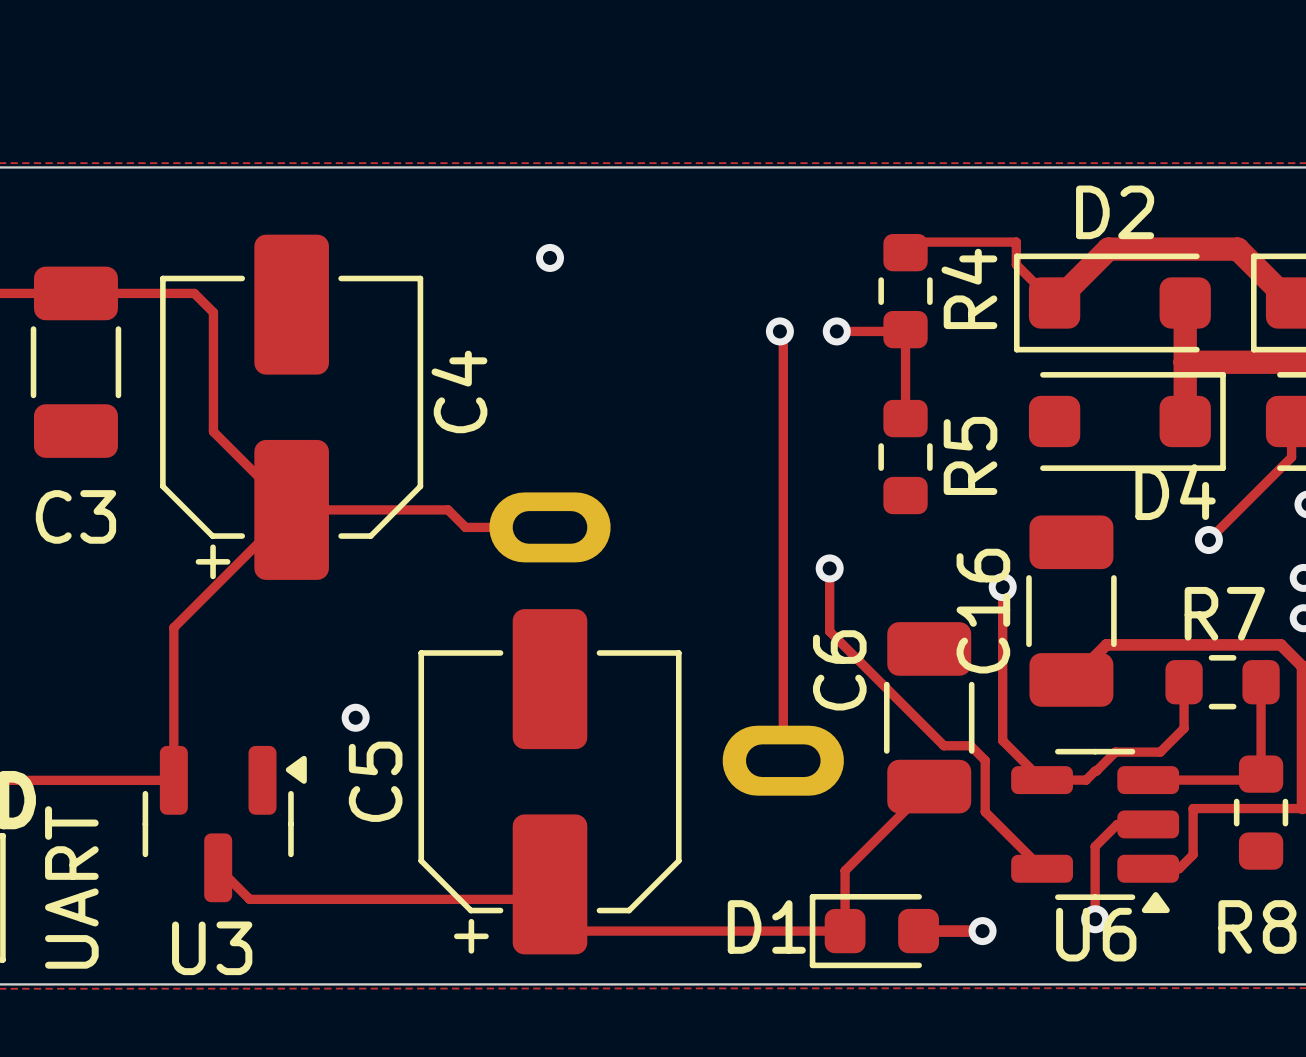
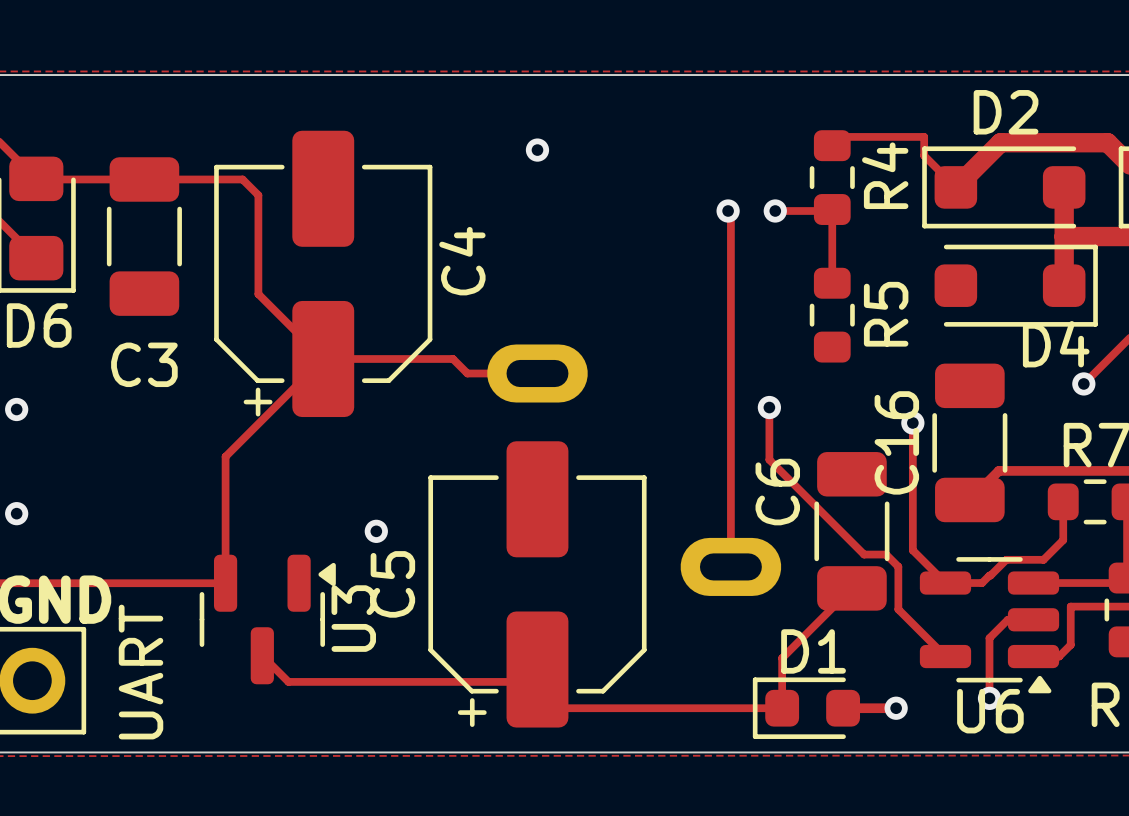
D1 name position: D1 (766, 926) -> D1 (813, 651)
U3 name rotation: 0° (212, 948) -> 90° counterclockwise (353, 618)
U3 name position: U3 (212, 948) -> U3 (353, 618)

